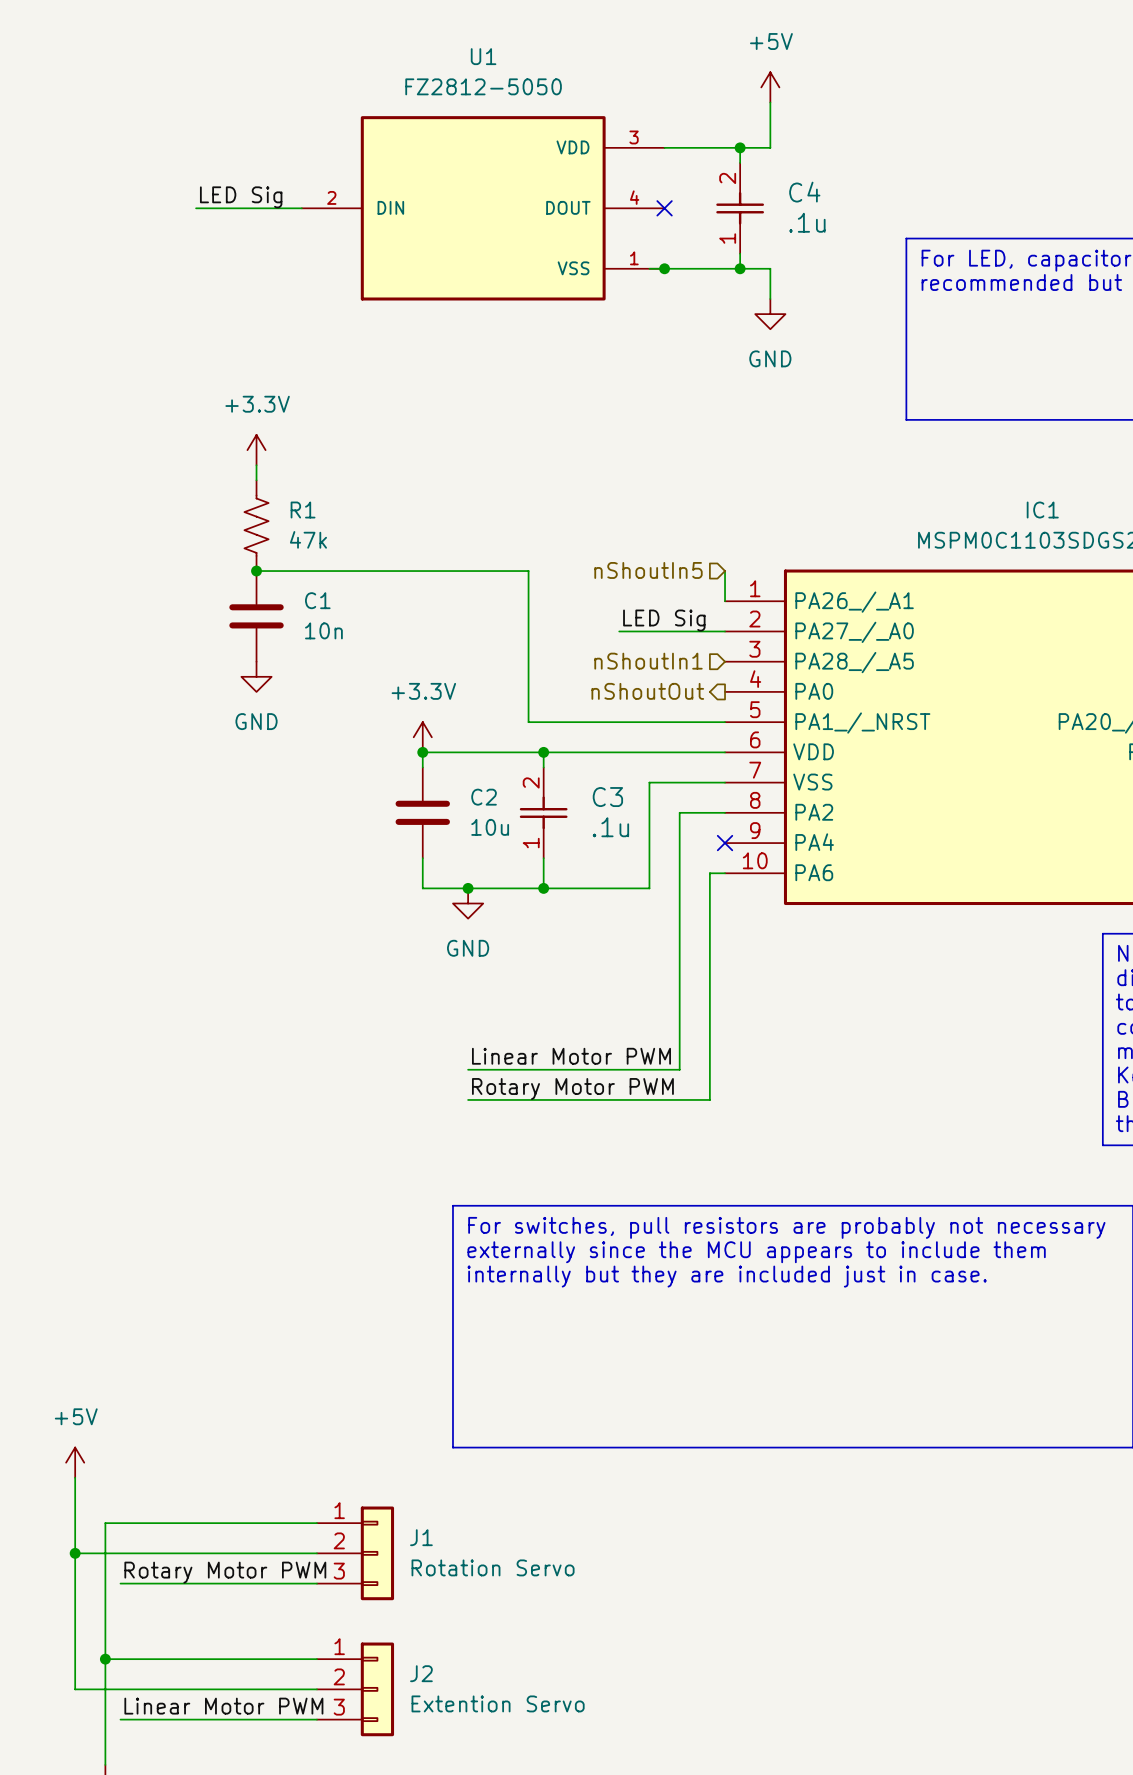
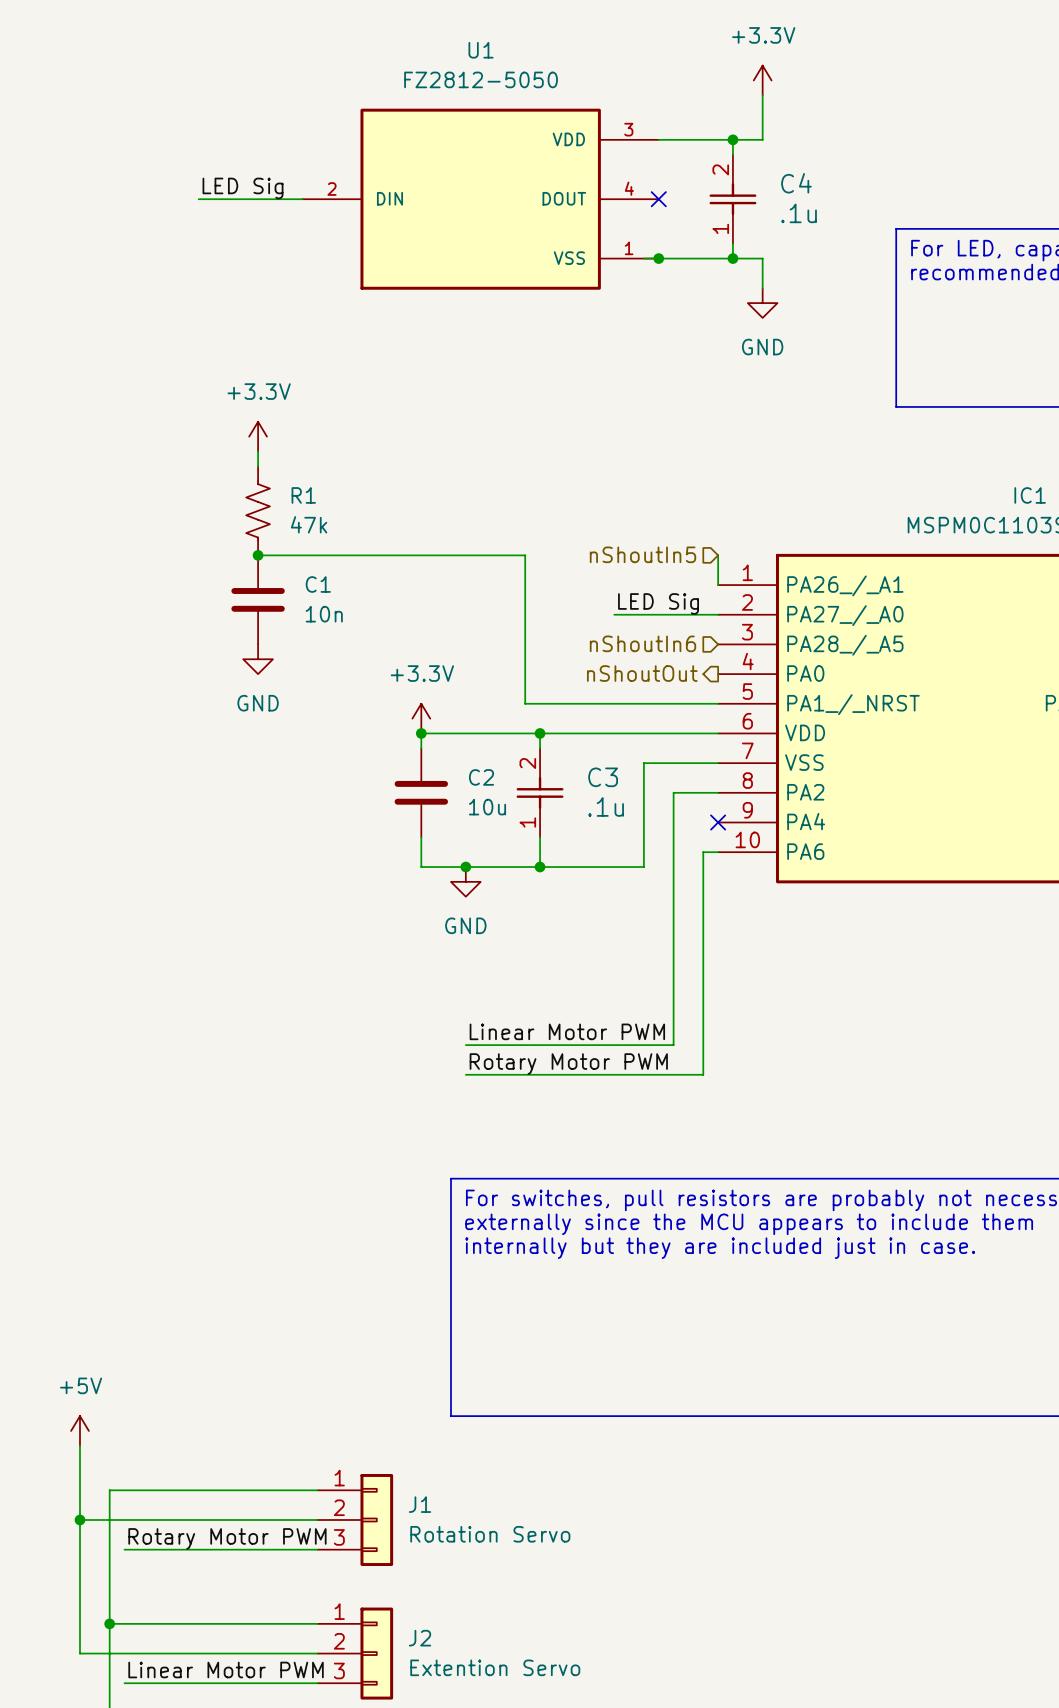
power symbol: +5V (770, 87) -> +3.3V (762, 80)
hierarchical label: nShoutIn1 (648, 661) -> nShoutIn6 (642, 643)

